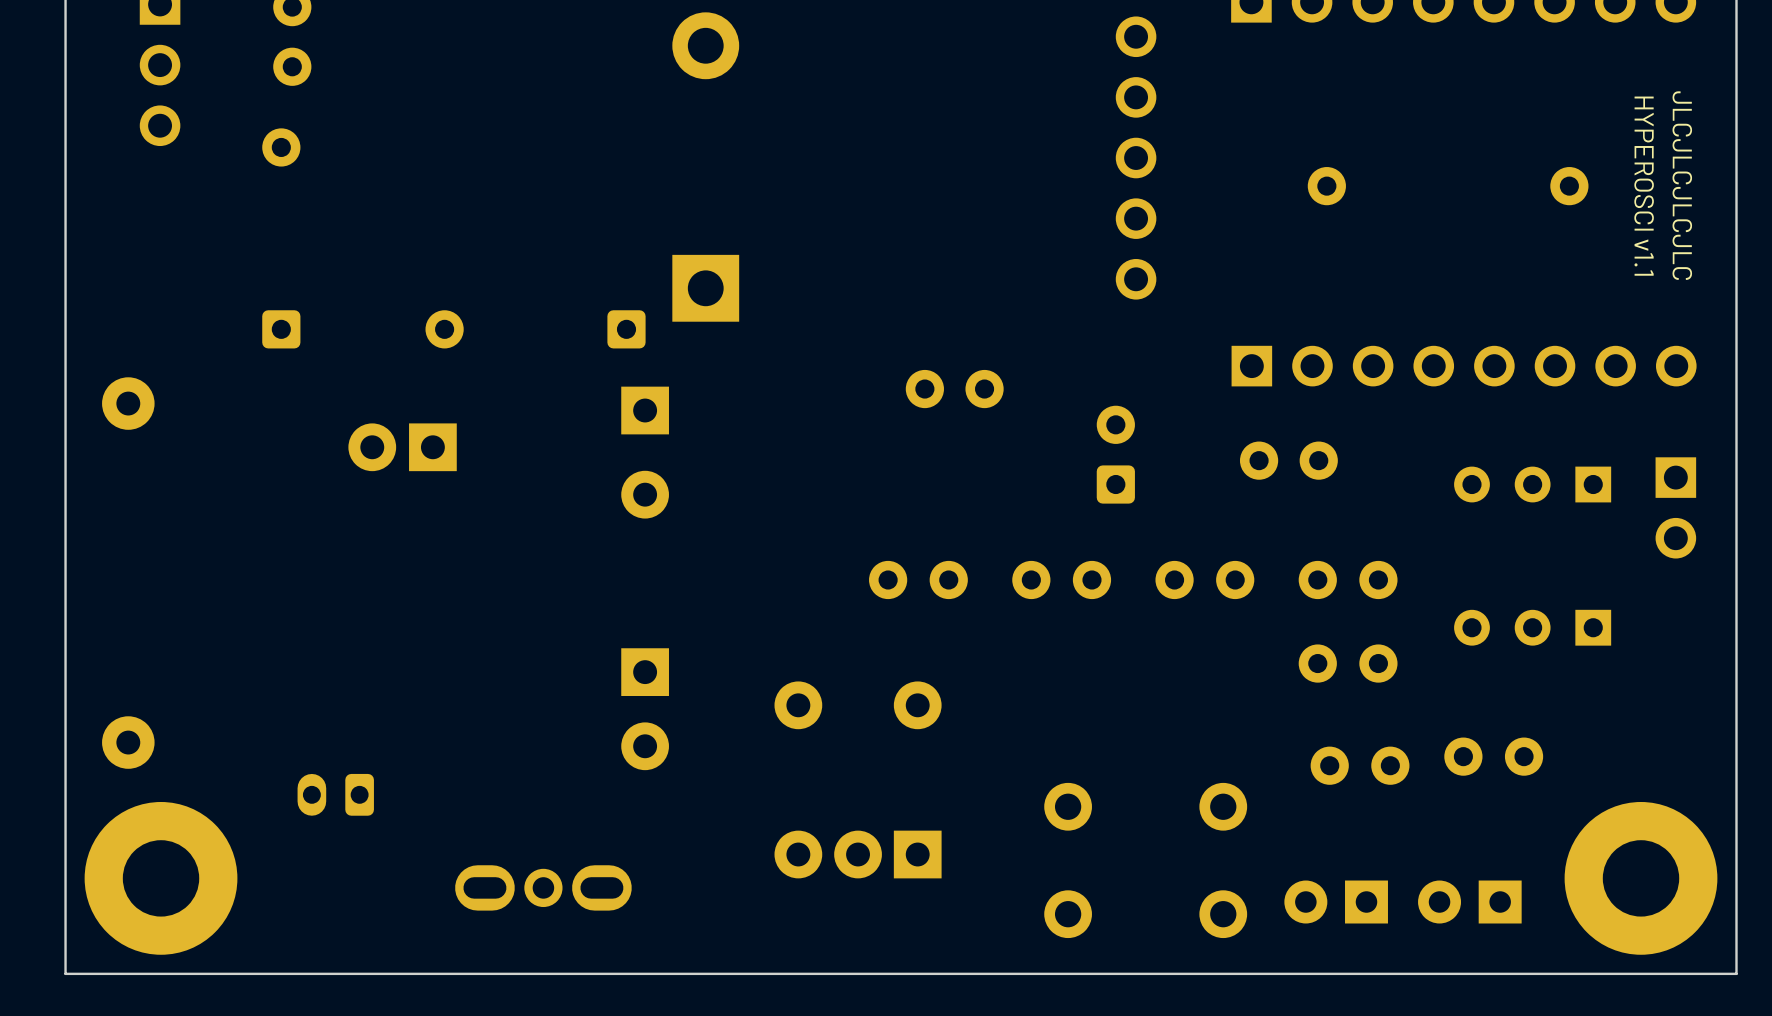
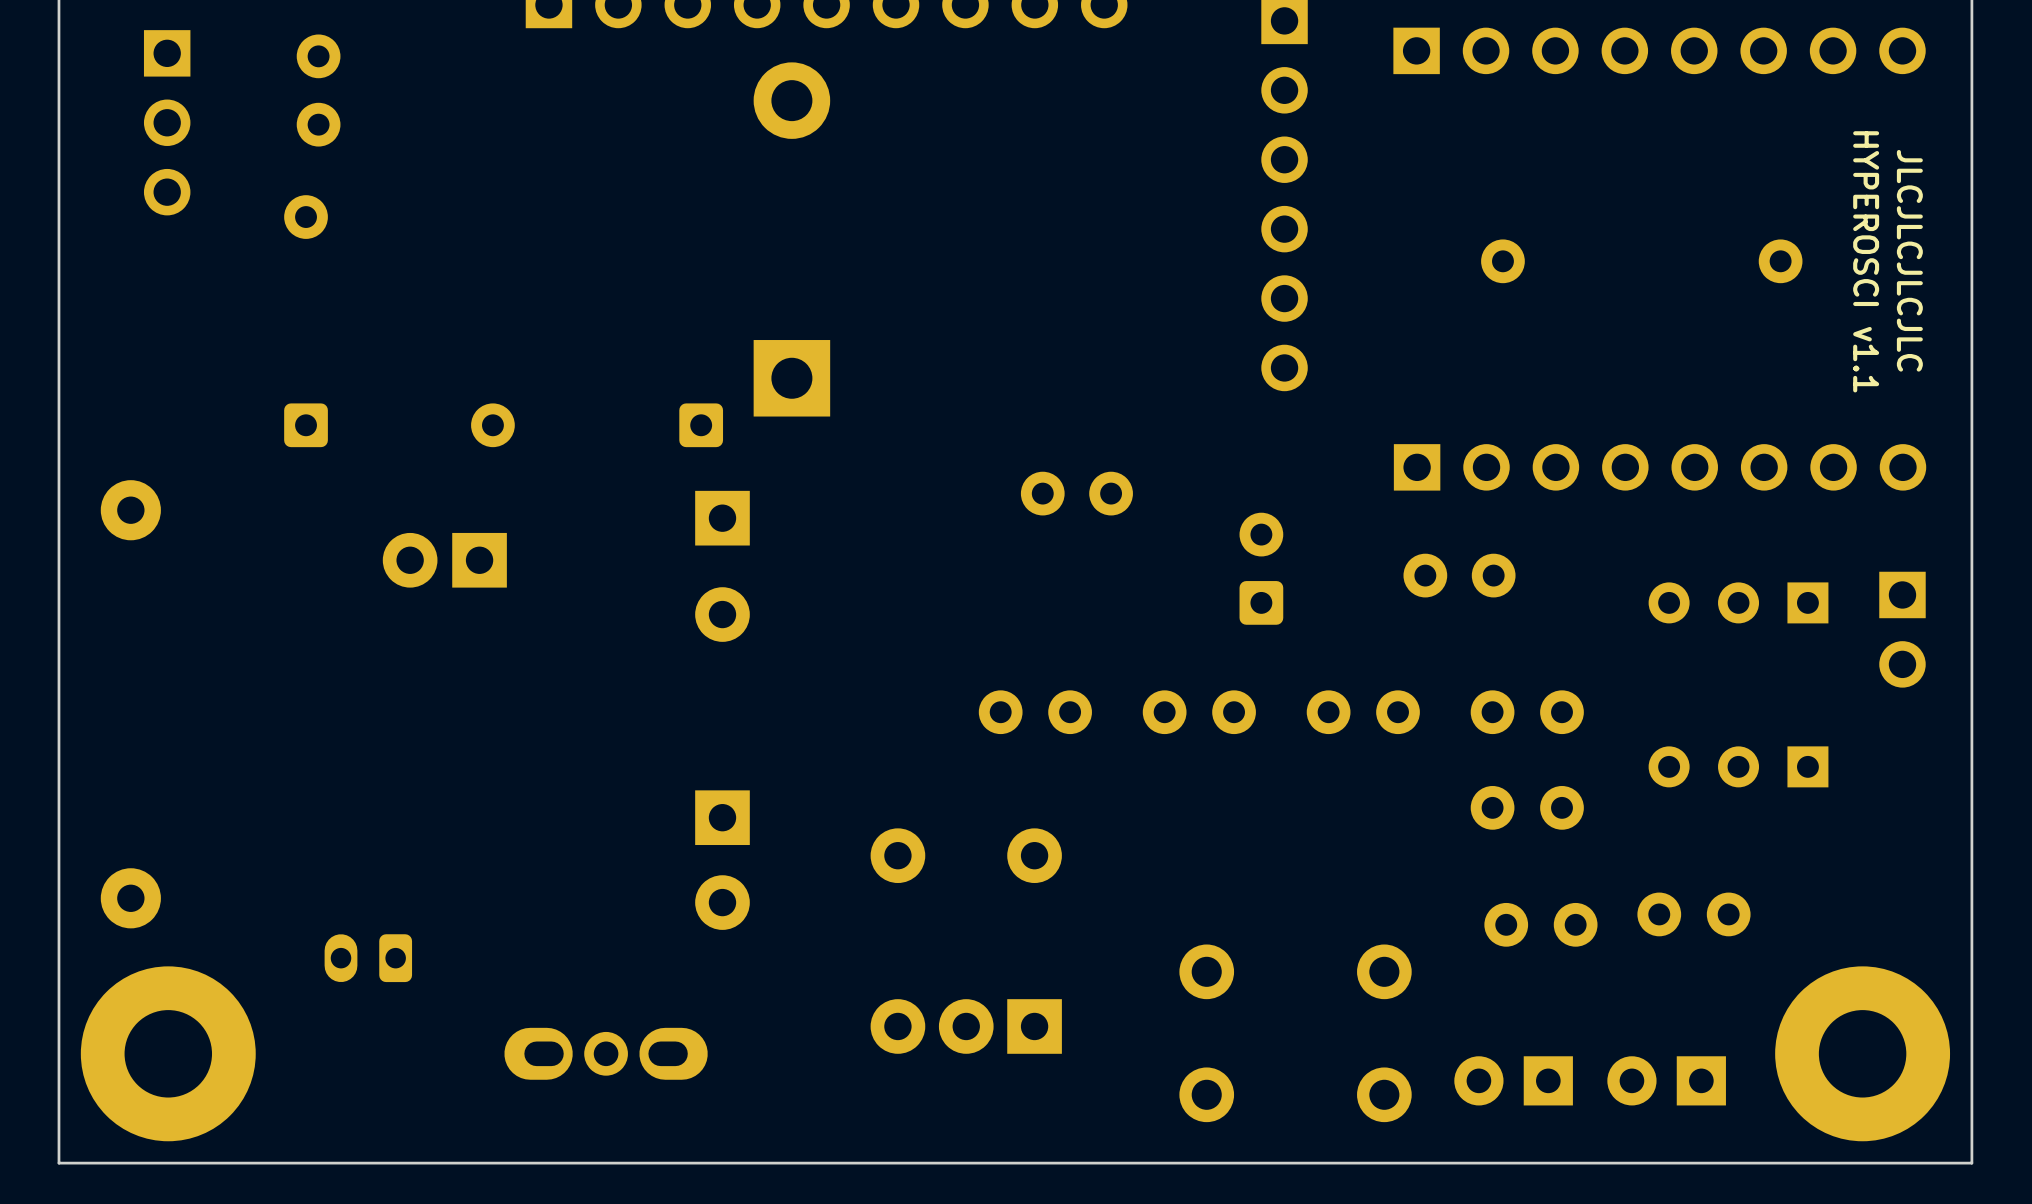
part footprint: [455, 865, 632, 911] -> [504, 1027, 708, 1080]

